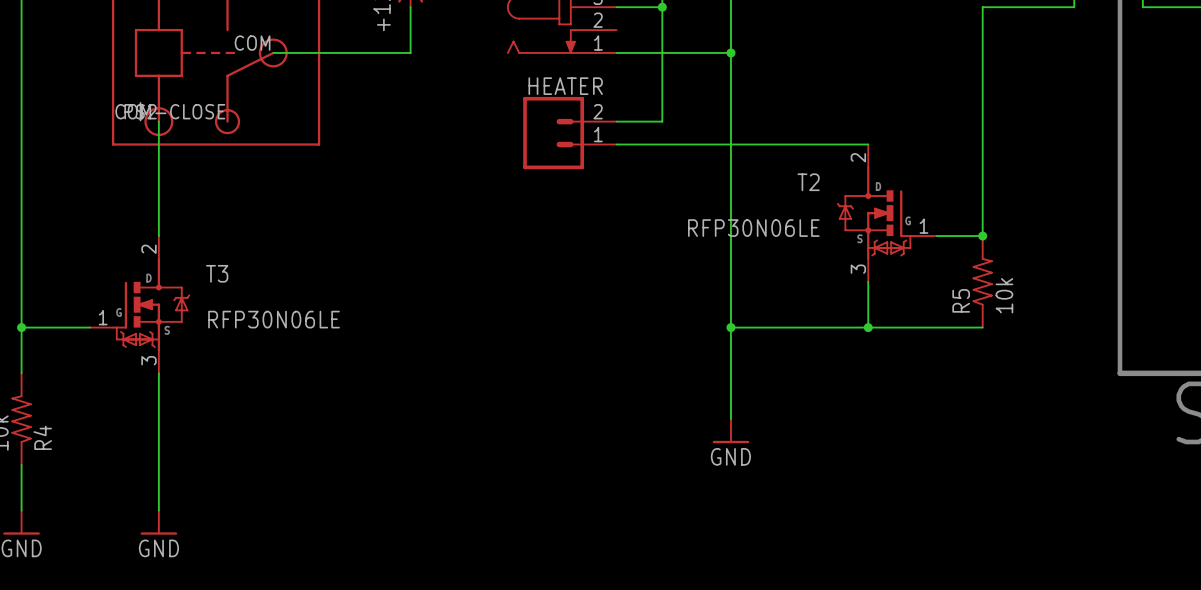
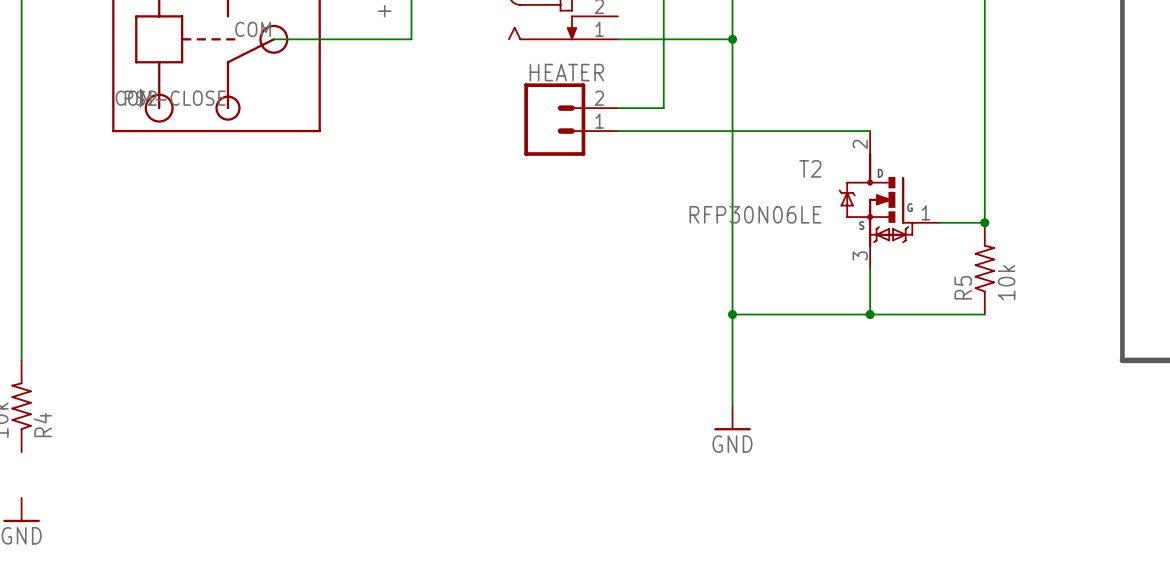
wire: (158, 121) (158, 236) -> none
T3: RFP30N06LE (140, 304) -> none
wire: (21, 327) (90, 327) -> none
junction: (21, 327) -> none
wire: (158, 373) (158, 510) -> none
wire: (21, 464) (21, 510) -> none
power symbol: GND (158, 522) -> none

